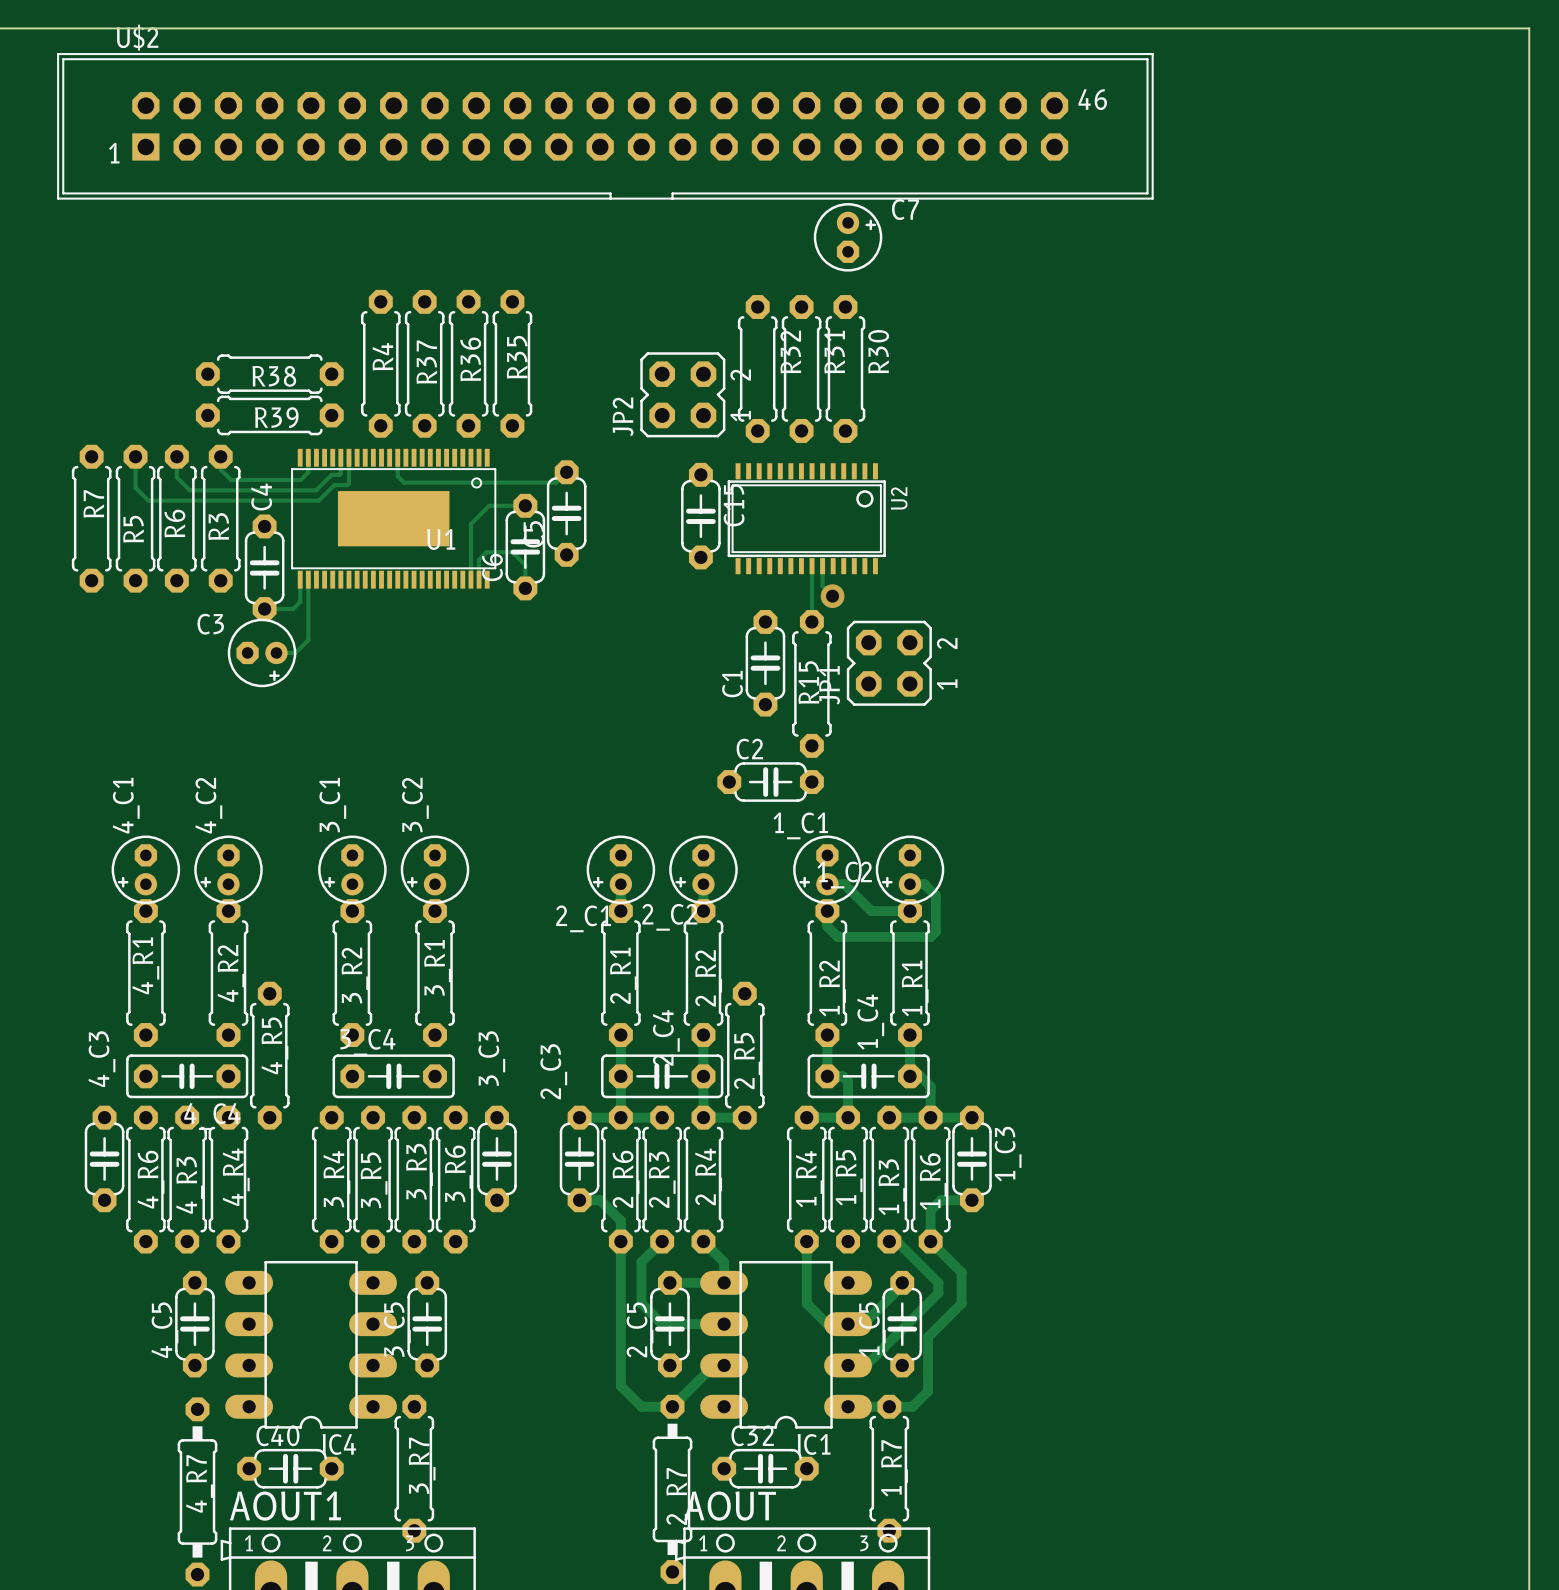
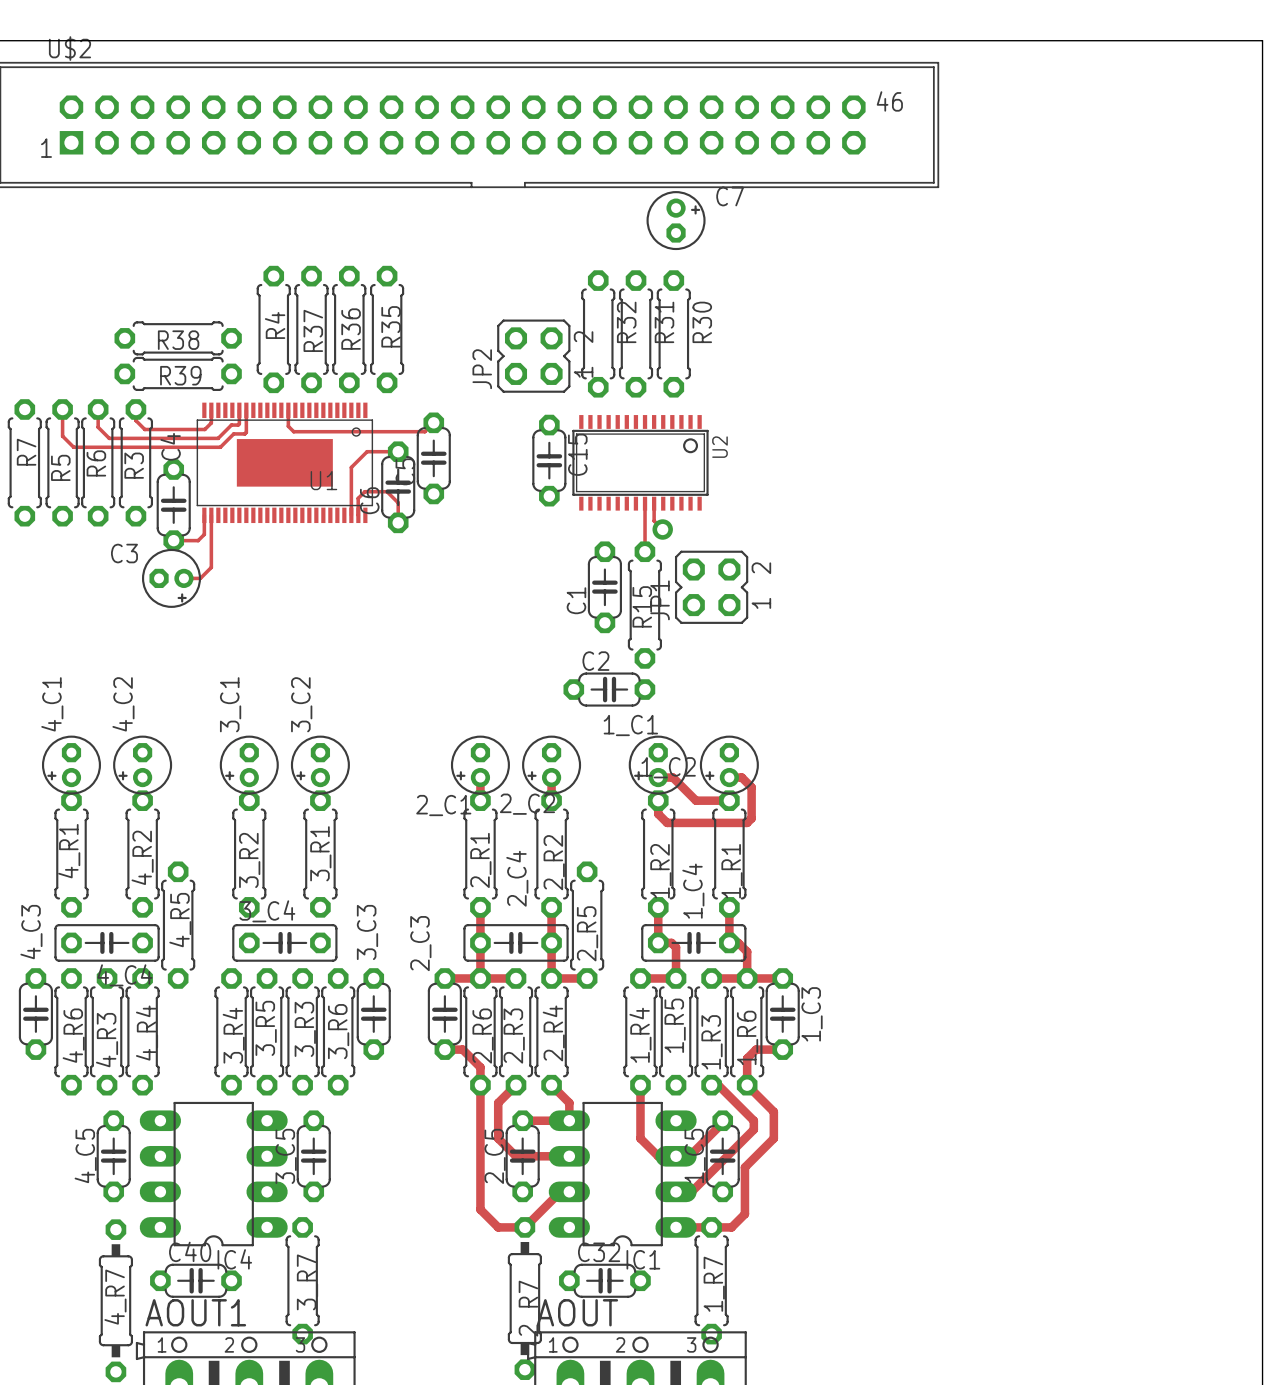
2_C4 name position: 2_C4 (666, 1037) -> 2_C4 (517, 878)

